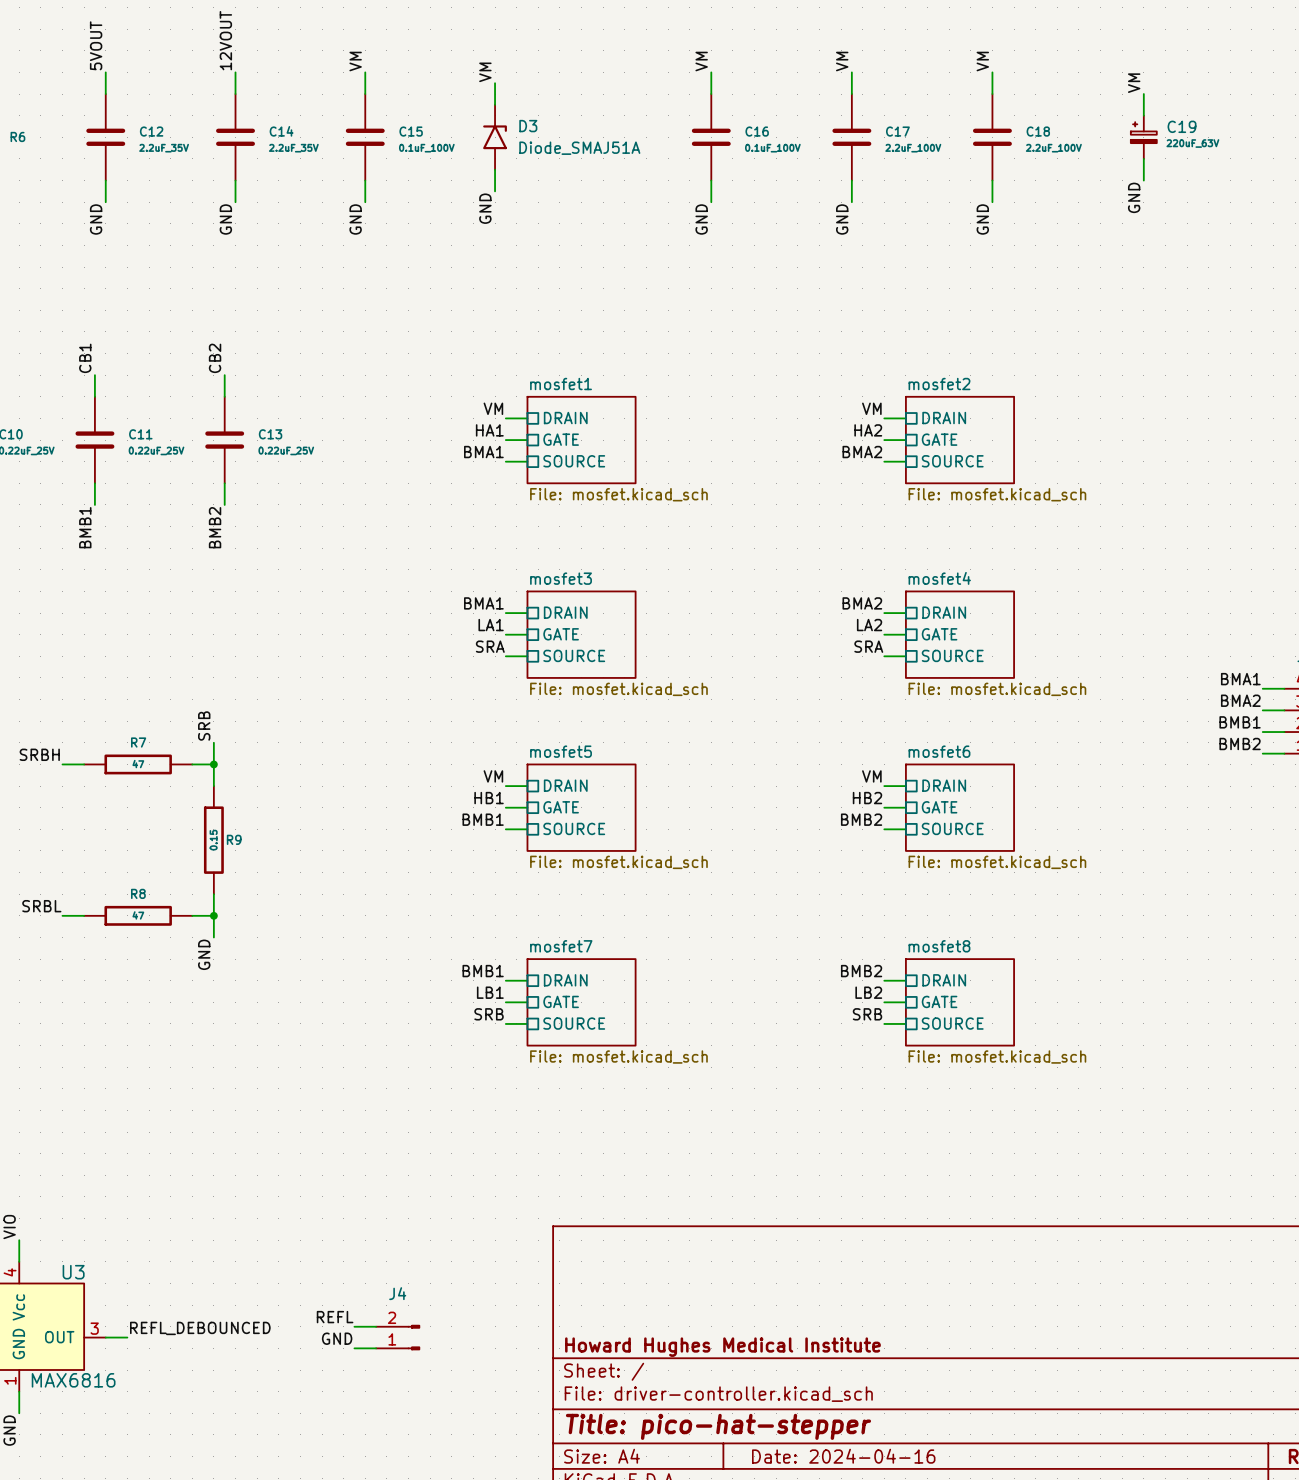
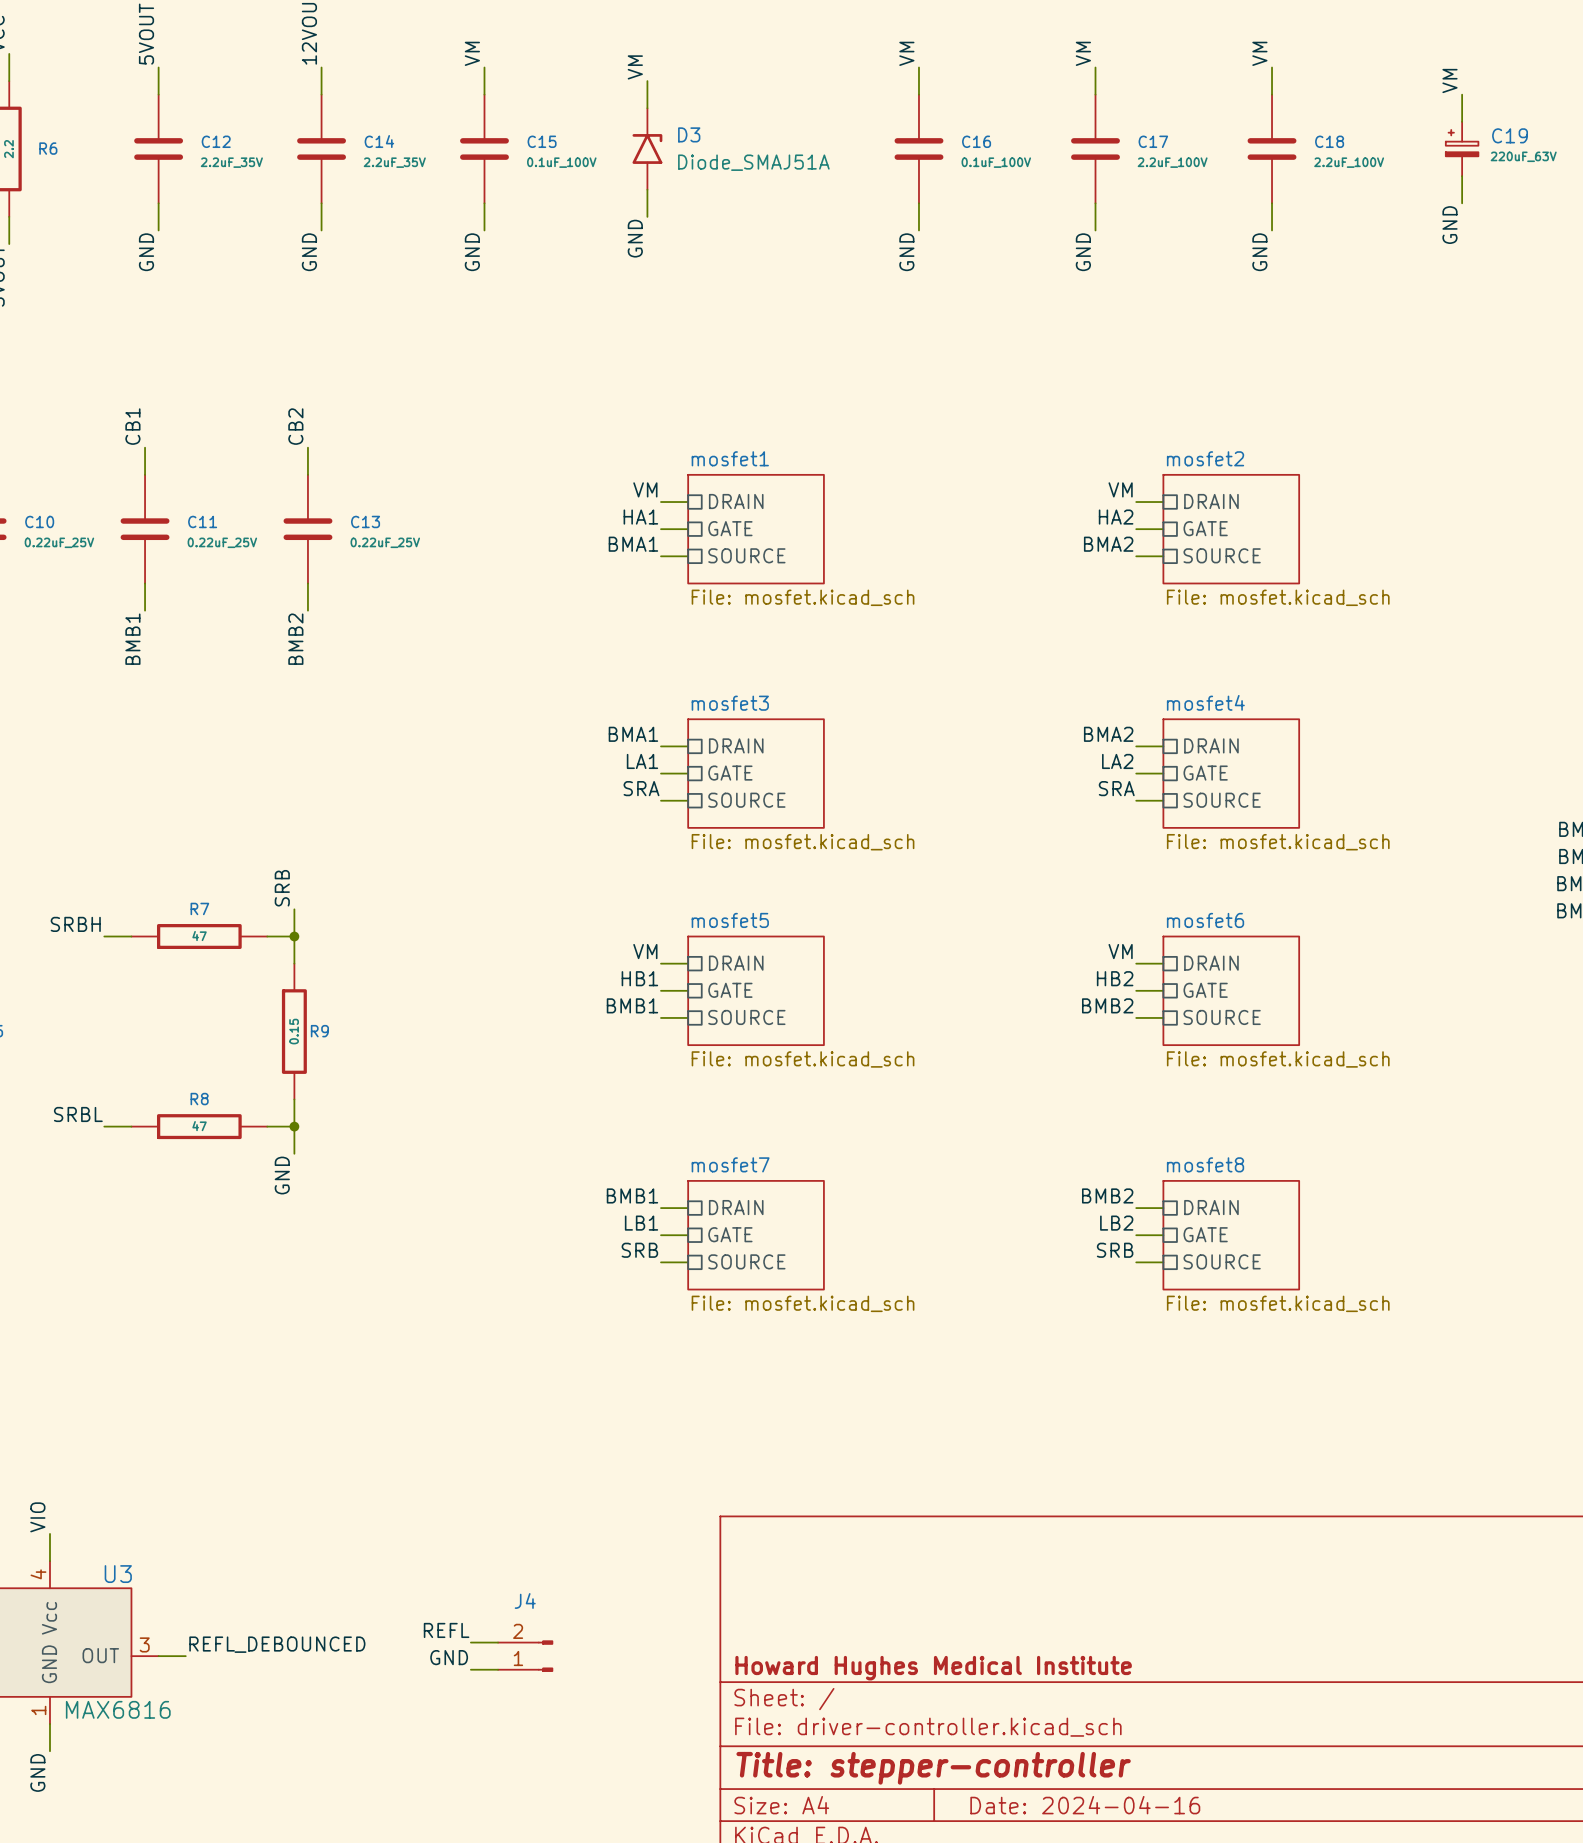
title block: Title: pico-hat-stepper (718, 1426) -> Title: stepper-controller (933, 1768)

